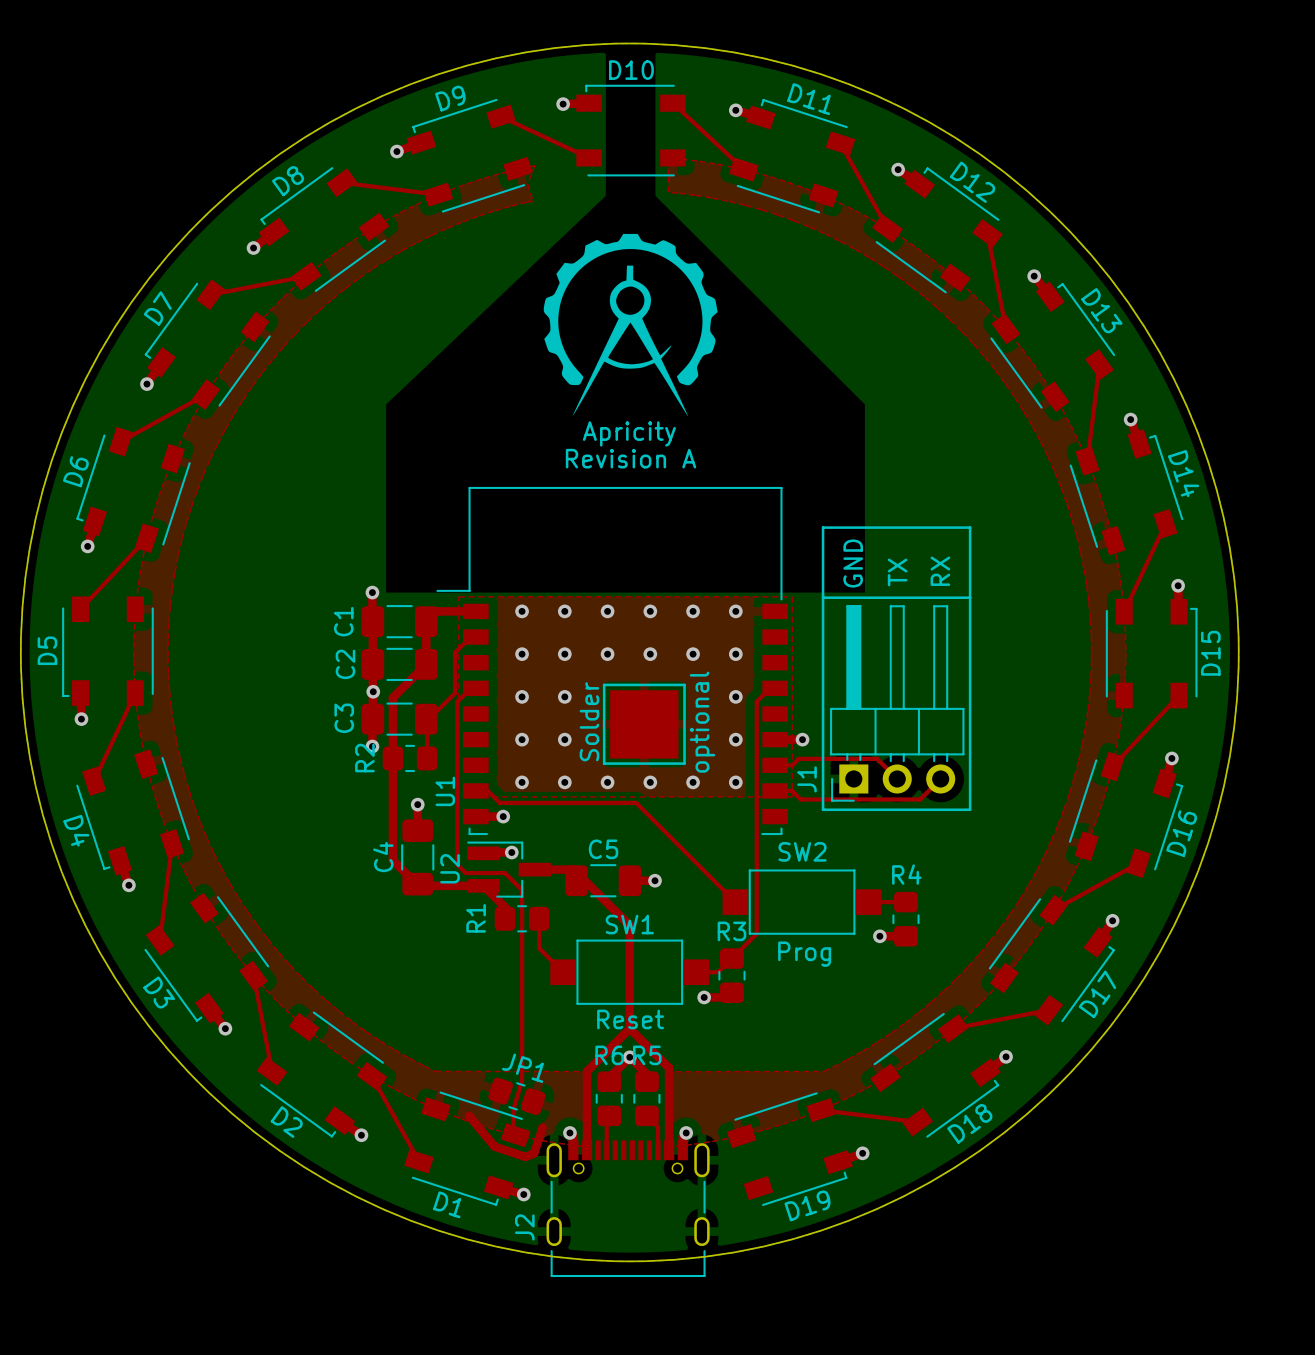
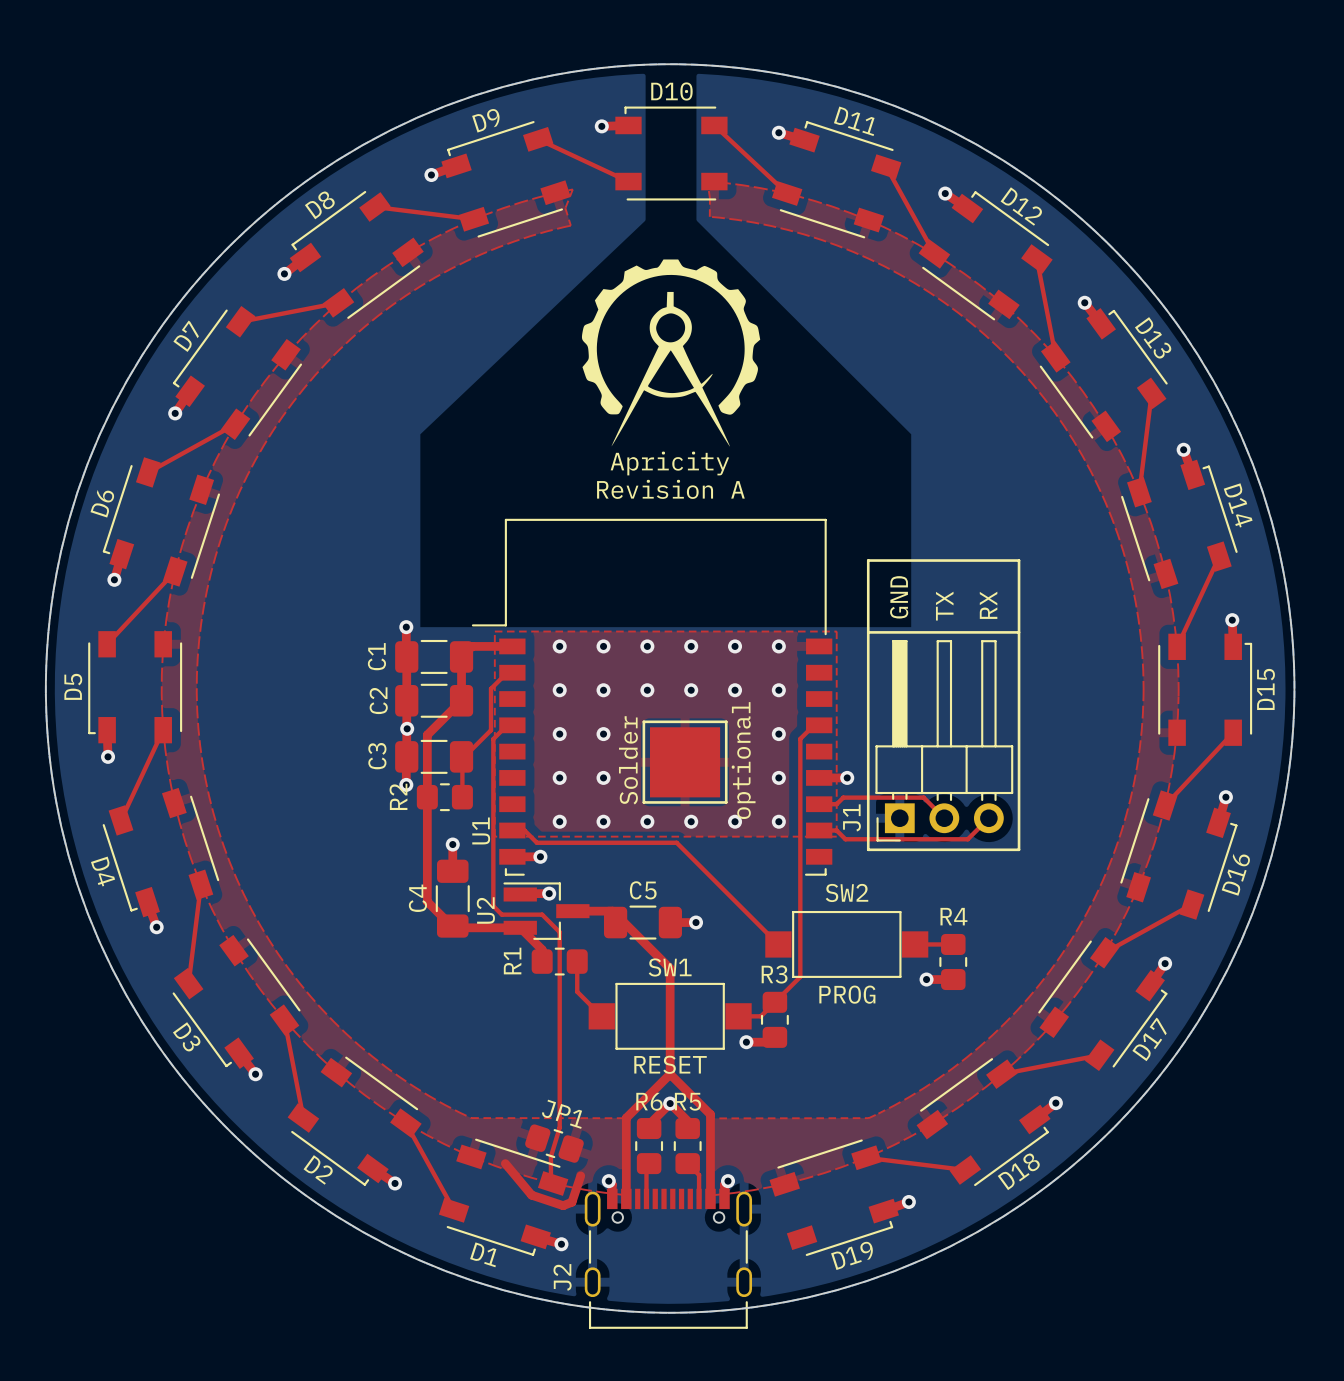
text: Prog (804, 954) -> PROG (847, 994)
text: Reset (630, 1019) -> RESET (670, 1064)

